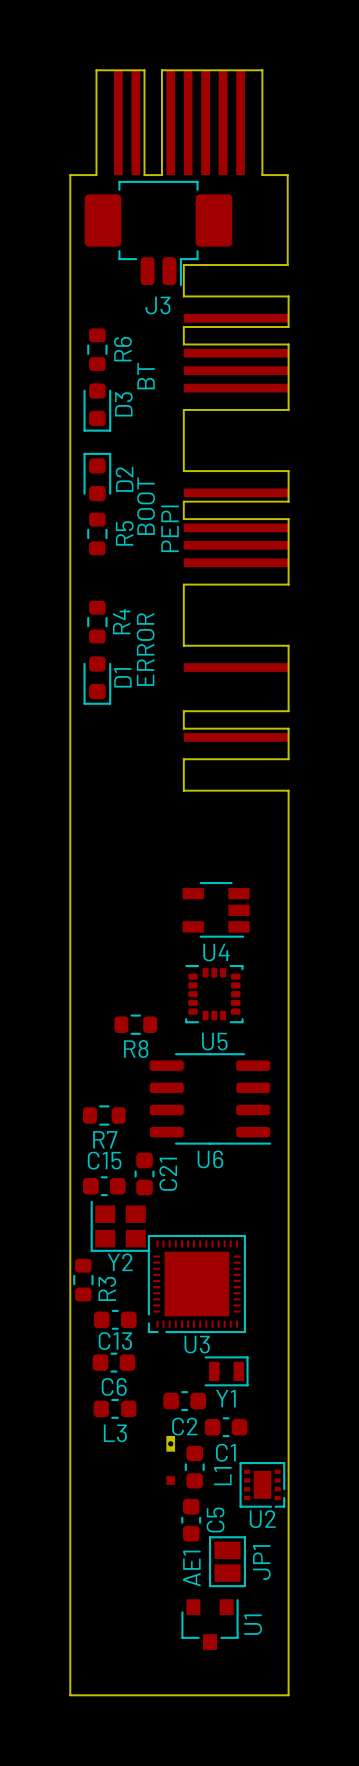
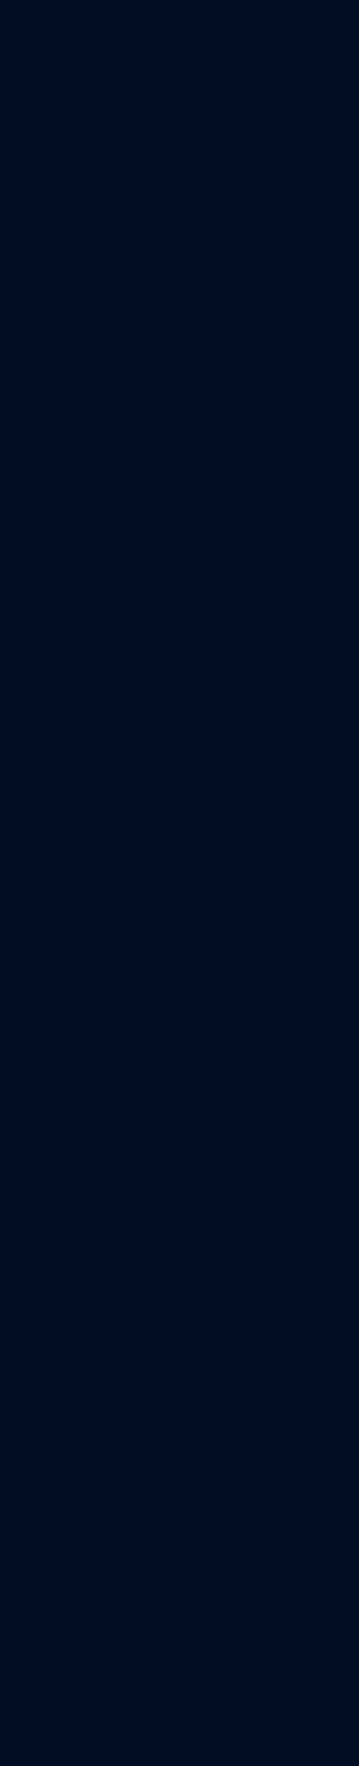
board edge: (96, 70) (96, 175) (70, 175) (70, 1695) (288, 1695) (288, 790) (183, 790) (183, 759) (288, 759) (288, 728) (183, 728) (183, 711) (288, 711) (288, 645) (183, 645) (183, 584) (288, 584) (288, 519) (183, 519) (183, 501) (288, 501) (288, 471) (183, 471) (183, 409) (288, 409) (288, 344) (183, 344) (183, 327) (288, 327) (288, 296) (183, 296) (183, 265) (287, 265) (287, 175) (262, 175) (262, 70) (161, 70) (161, 175) (144, 175) (144, 70) (96, 70) -> none
part: (179, 122) -> none
J3: (158, 233) -> none
R6: (97, 349) -> none
text: BT (146, 376) -> none
D3: (97, 407) -> none
D2: (97, 477) -> none
text: BOOT (146, 506) -> none
part: PEPI (236, 527) -> none
R5: (97, 533) -> none
R4: (97, 622) -> none
text: ERROR (145, 649) -> none
D1: (97, 680) -> none
U4: (216, 909) -> none
U5: (214, 994) -> none
R8: (135, 1024) -> none
U6: (210, 1098) -> none
R7: (104, 1115) -> none
C21: (144, 1174) -> none
C15: (104, 1186) -> none
Y2: (120, 1226) -> none
R3: (83, 1280) -> none
U3: (196, 1284) -> none
C13: (115, 1319) -> none
C6: (113, 1362) -> none
Y1: (226, 1371) -> none
C2: (184, 1401) -> none
L3: (115, 1408) -> none
C1: (226, 1427) -> none
AE1: (170, 1460) -> none
L1: (194, 1467) -> none
U2: (262, 1484) -> none
C5: (191, 1520) -> none
JP1: (227, 1561) -> none
U1: (210, 1624) -> none

